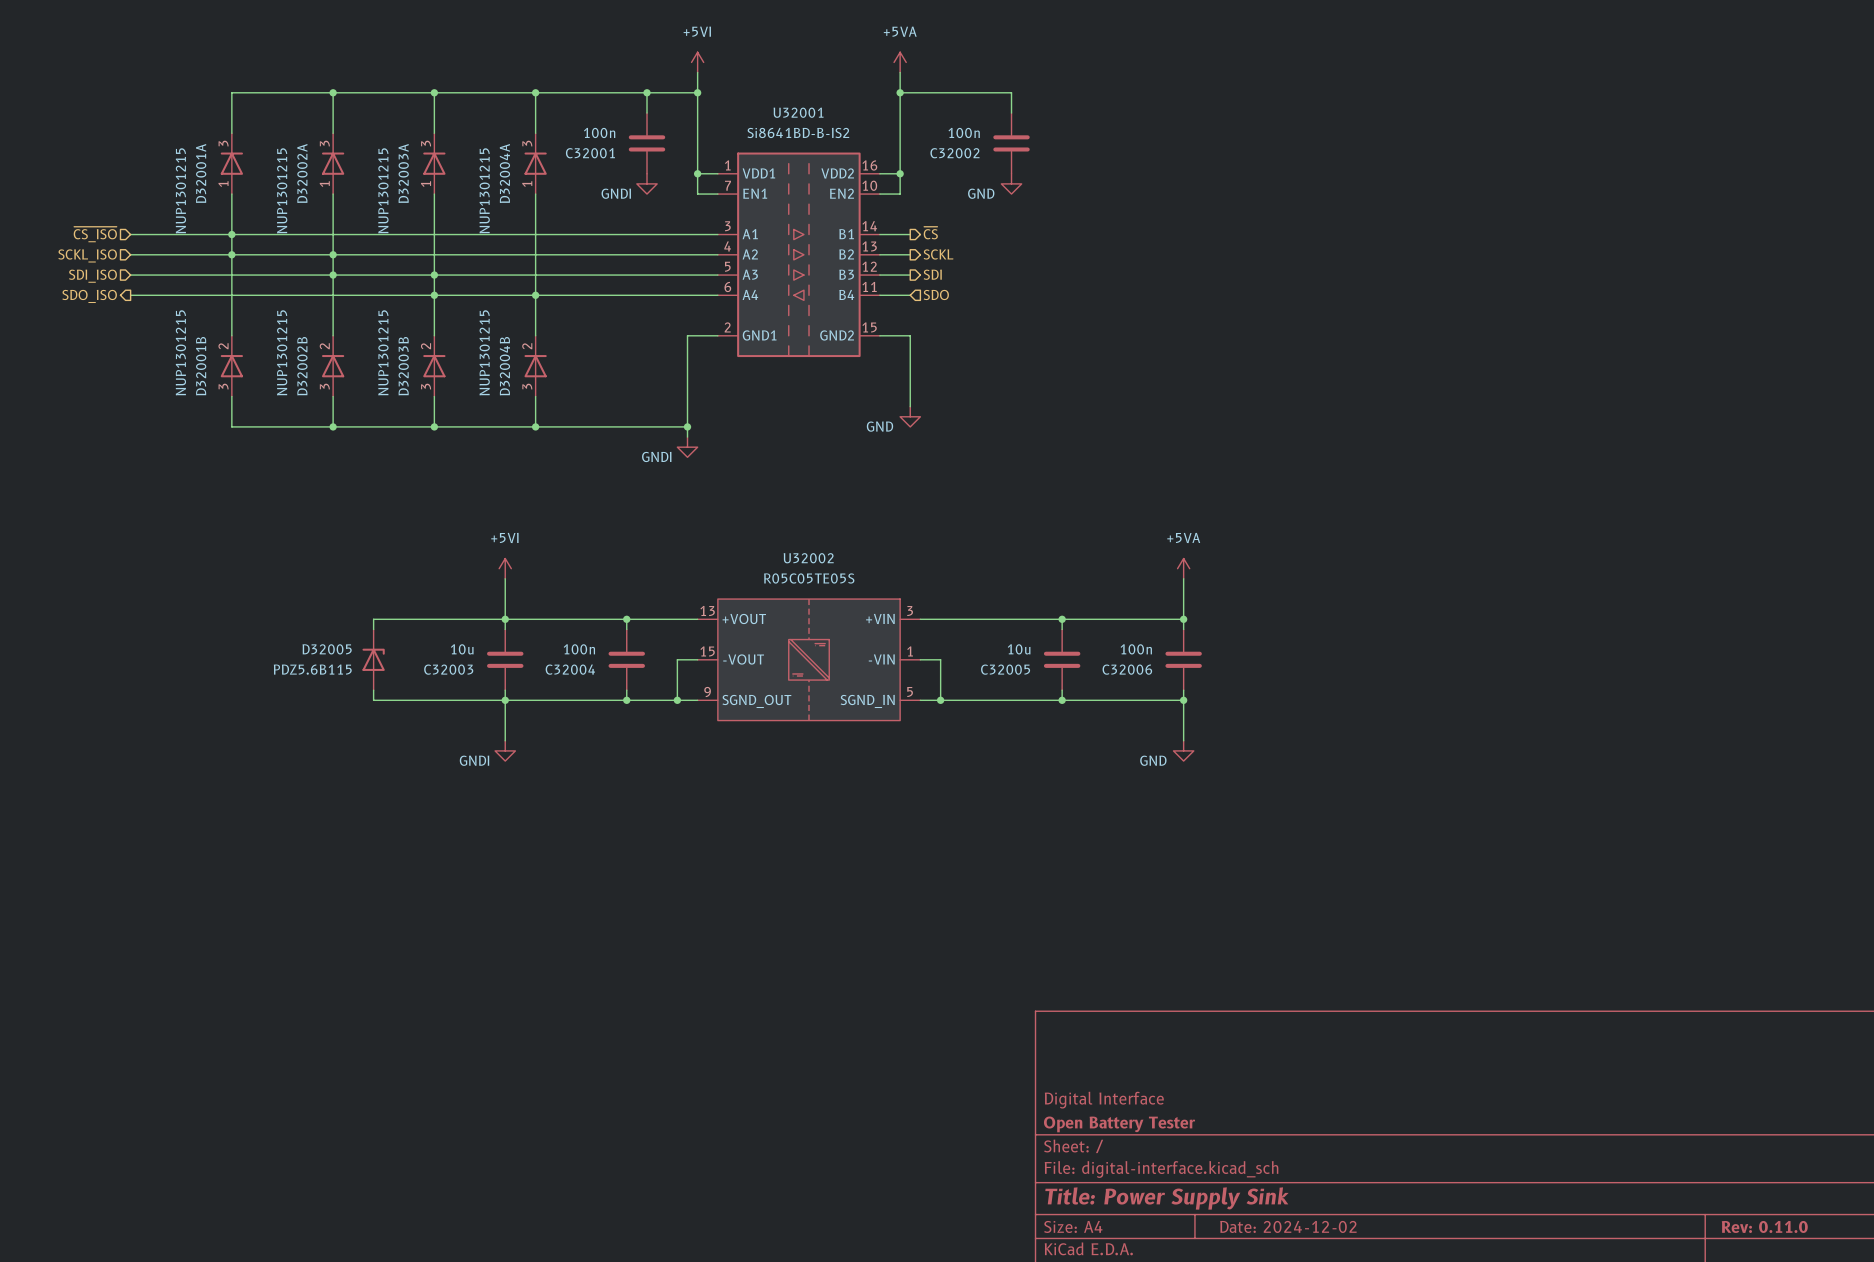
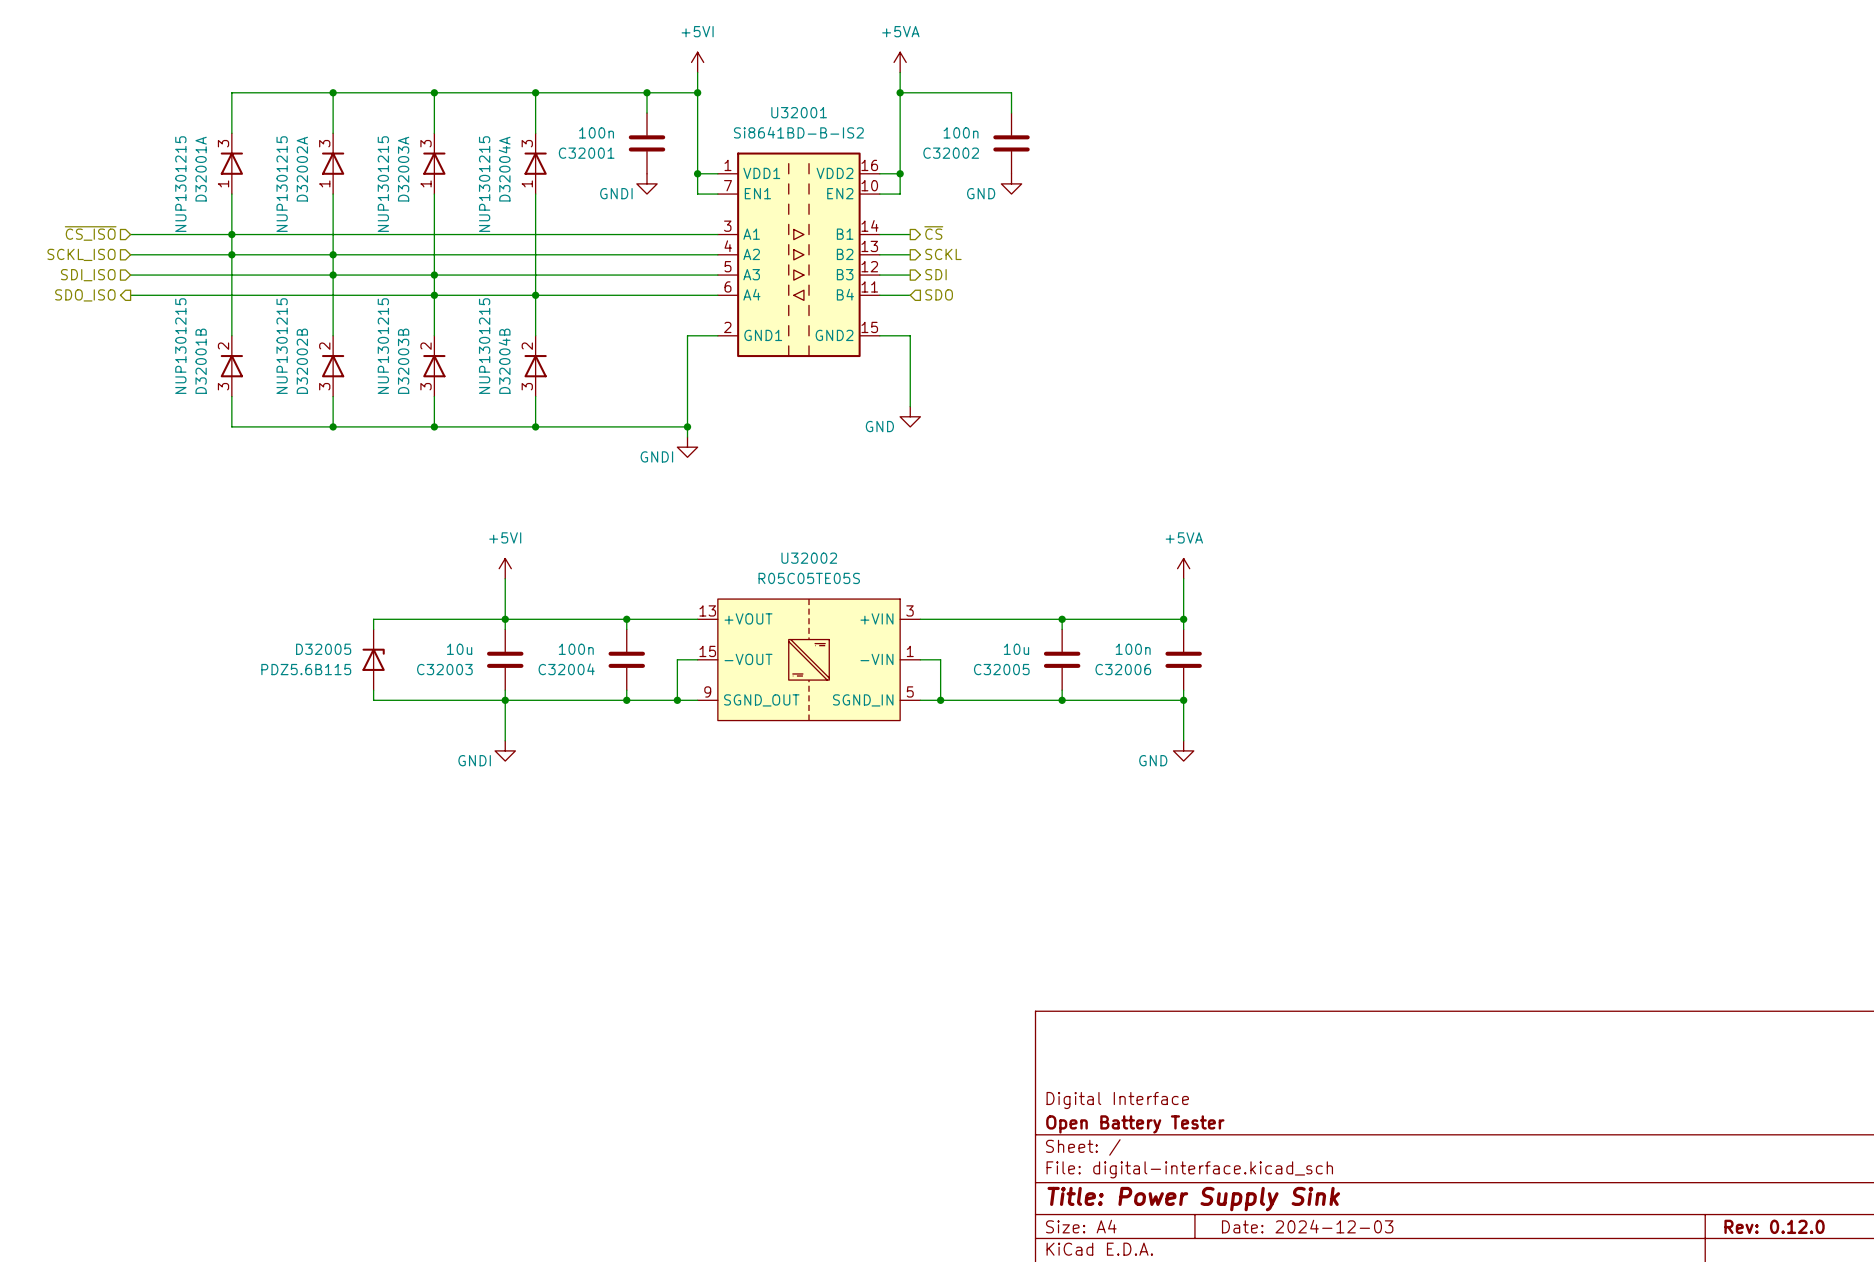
title block: Date: 2024-12-02 (1288, 1226) -> Date: 2024-12-03 (1307, 1226)
title block: Rev: 0.11.0 (1764, 1226) -> Rev: 0.12.0 (1774, 1226)

